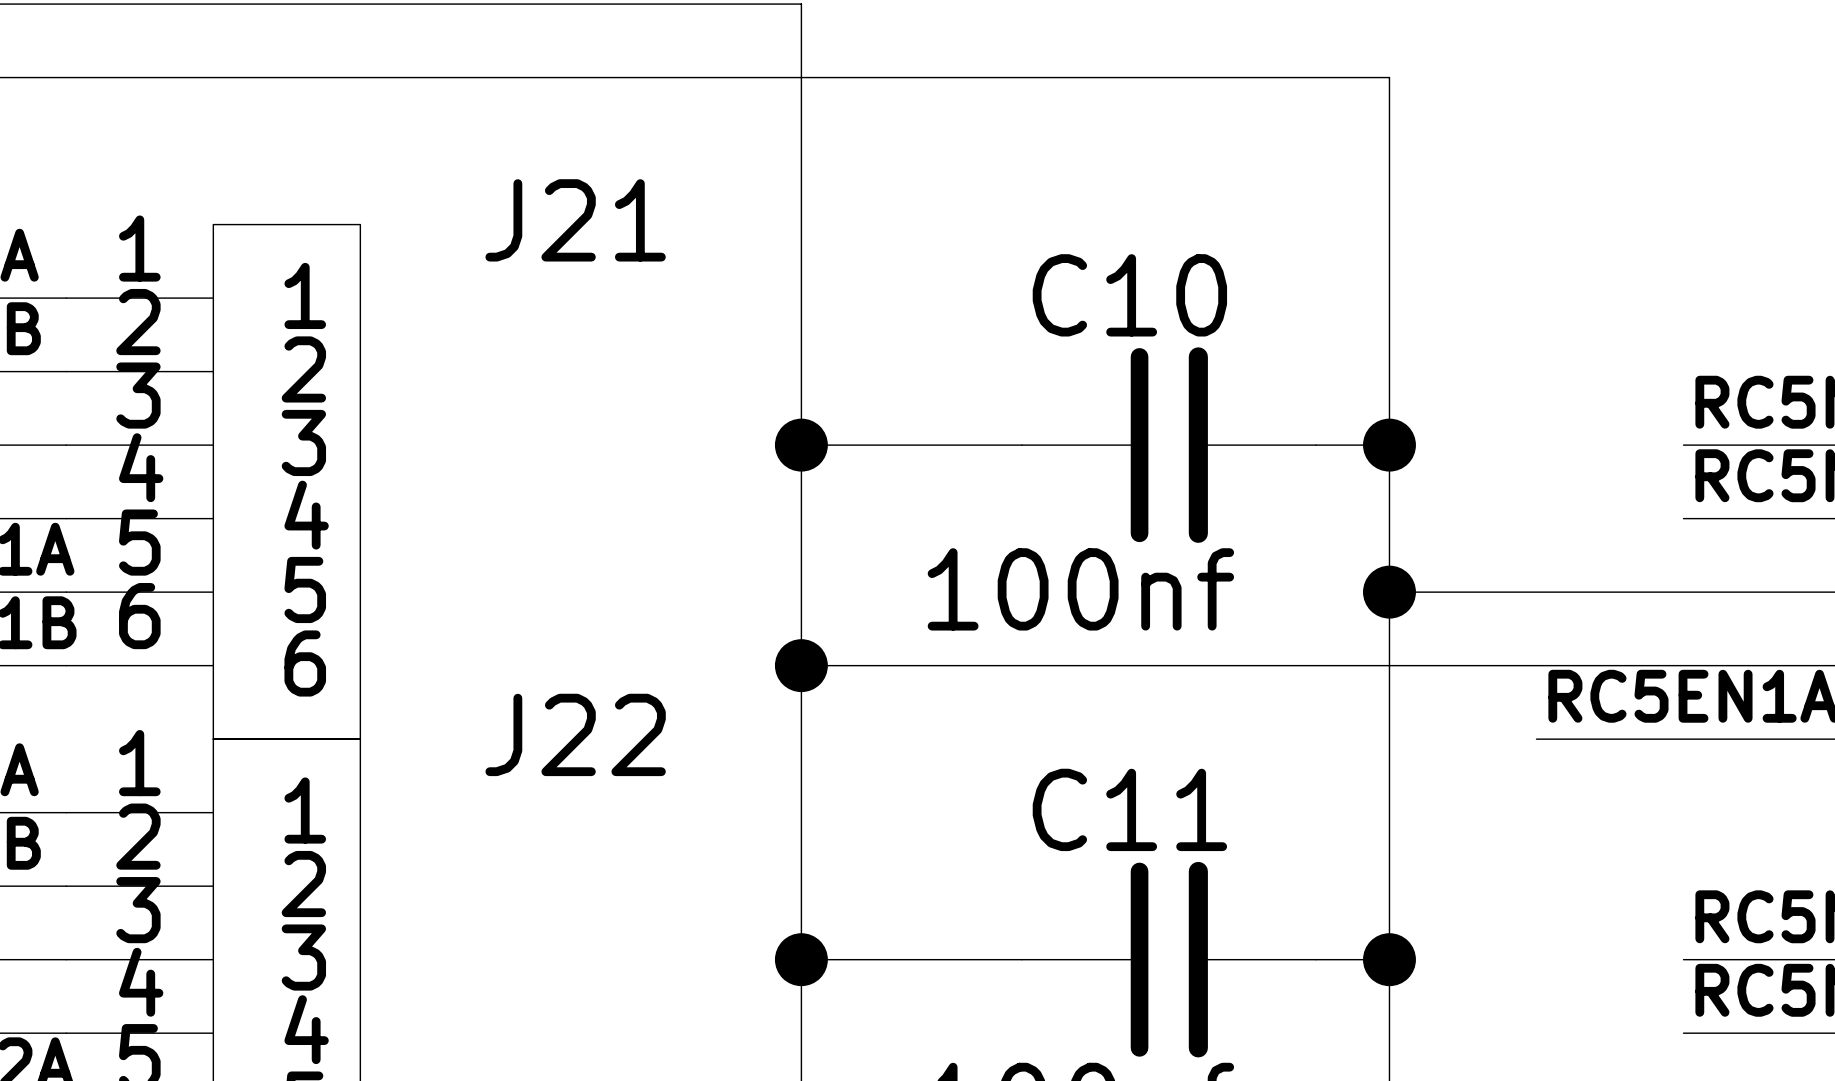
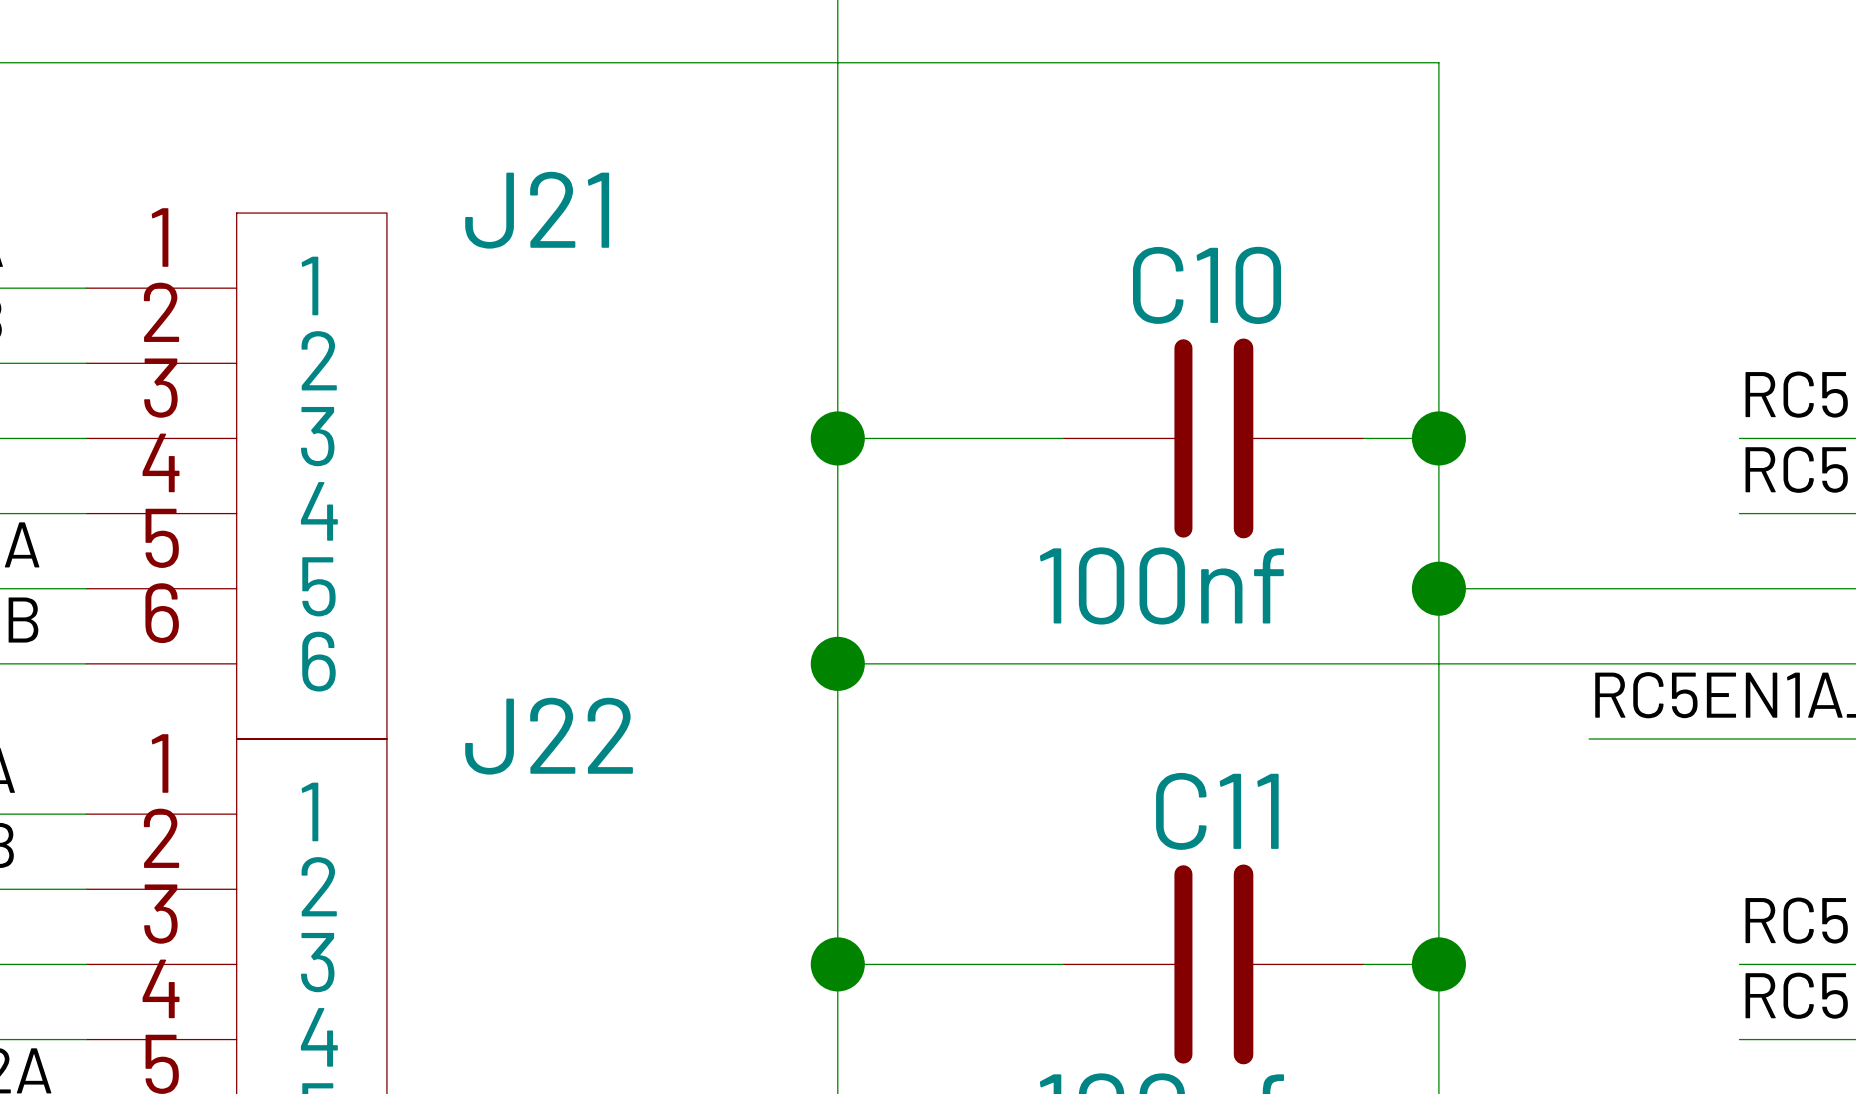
J21 name position: J21 (575, 220) -> J21 (537, 210)
J22 name position: J22 (575, 734) -> J22 (549, 736)

